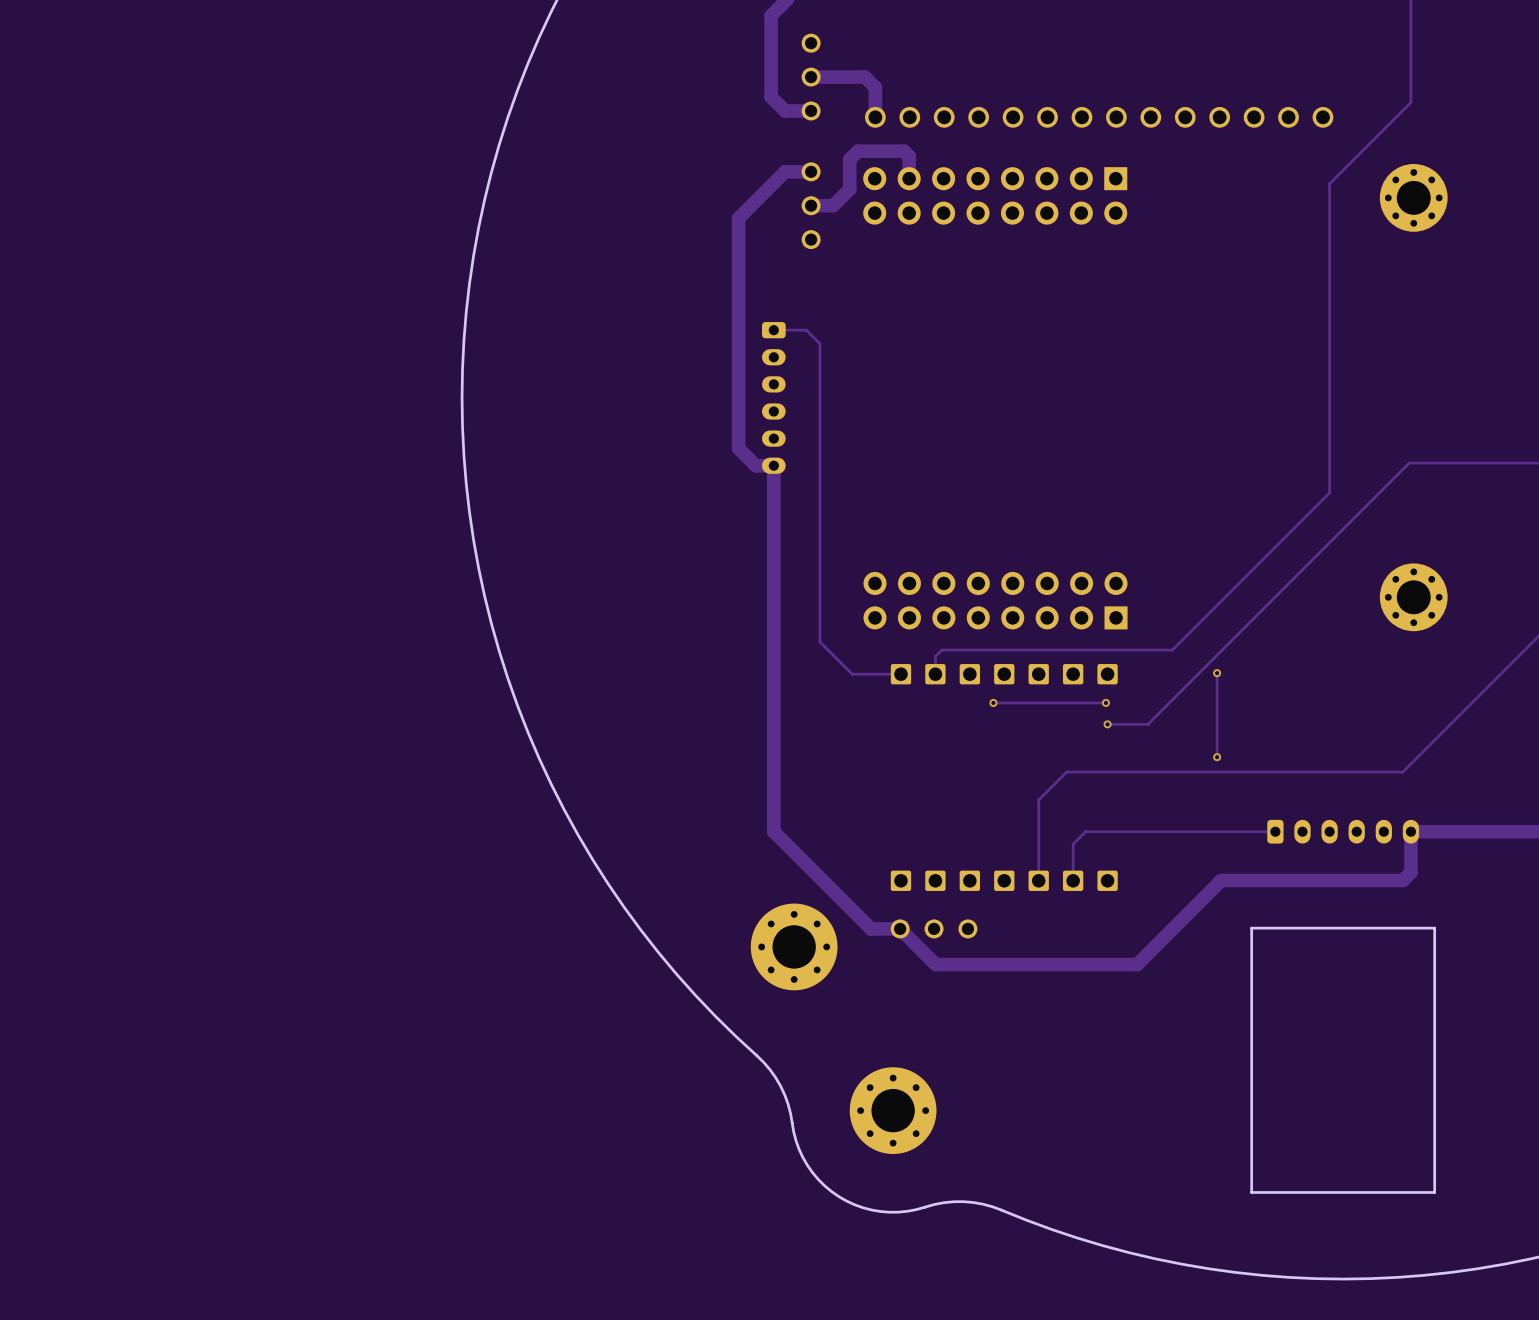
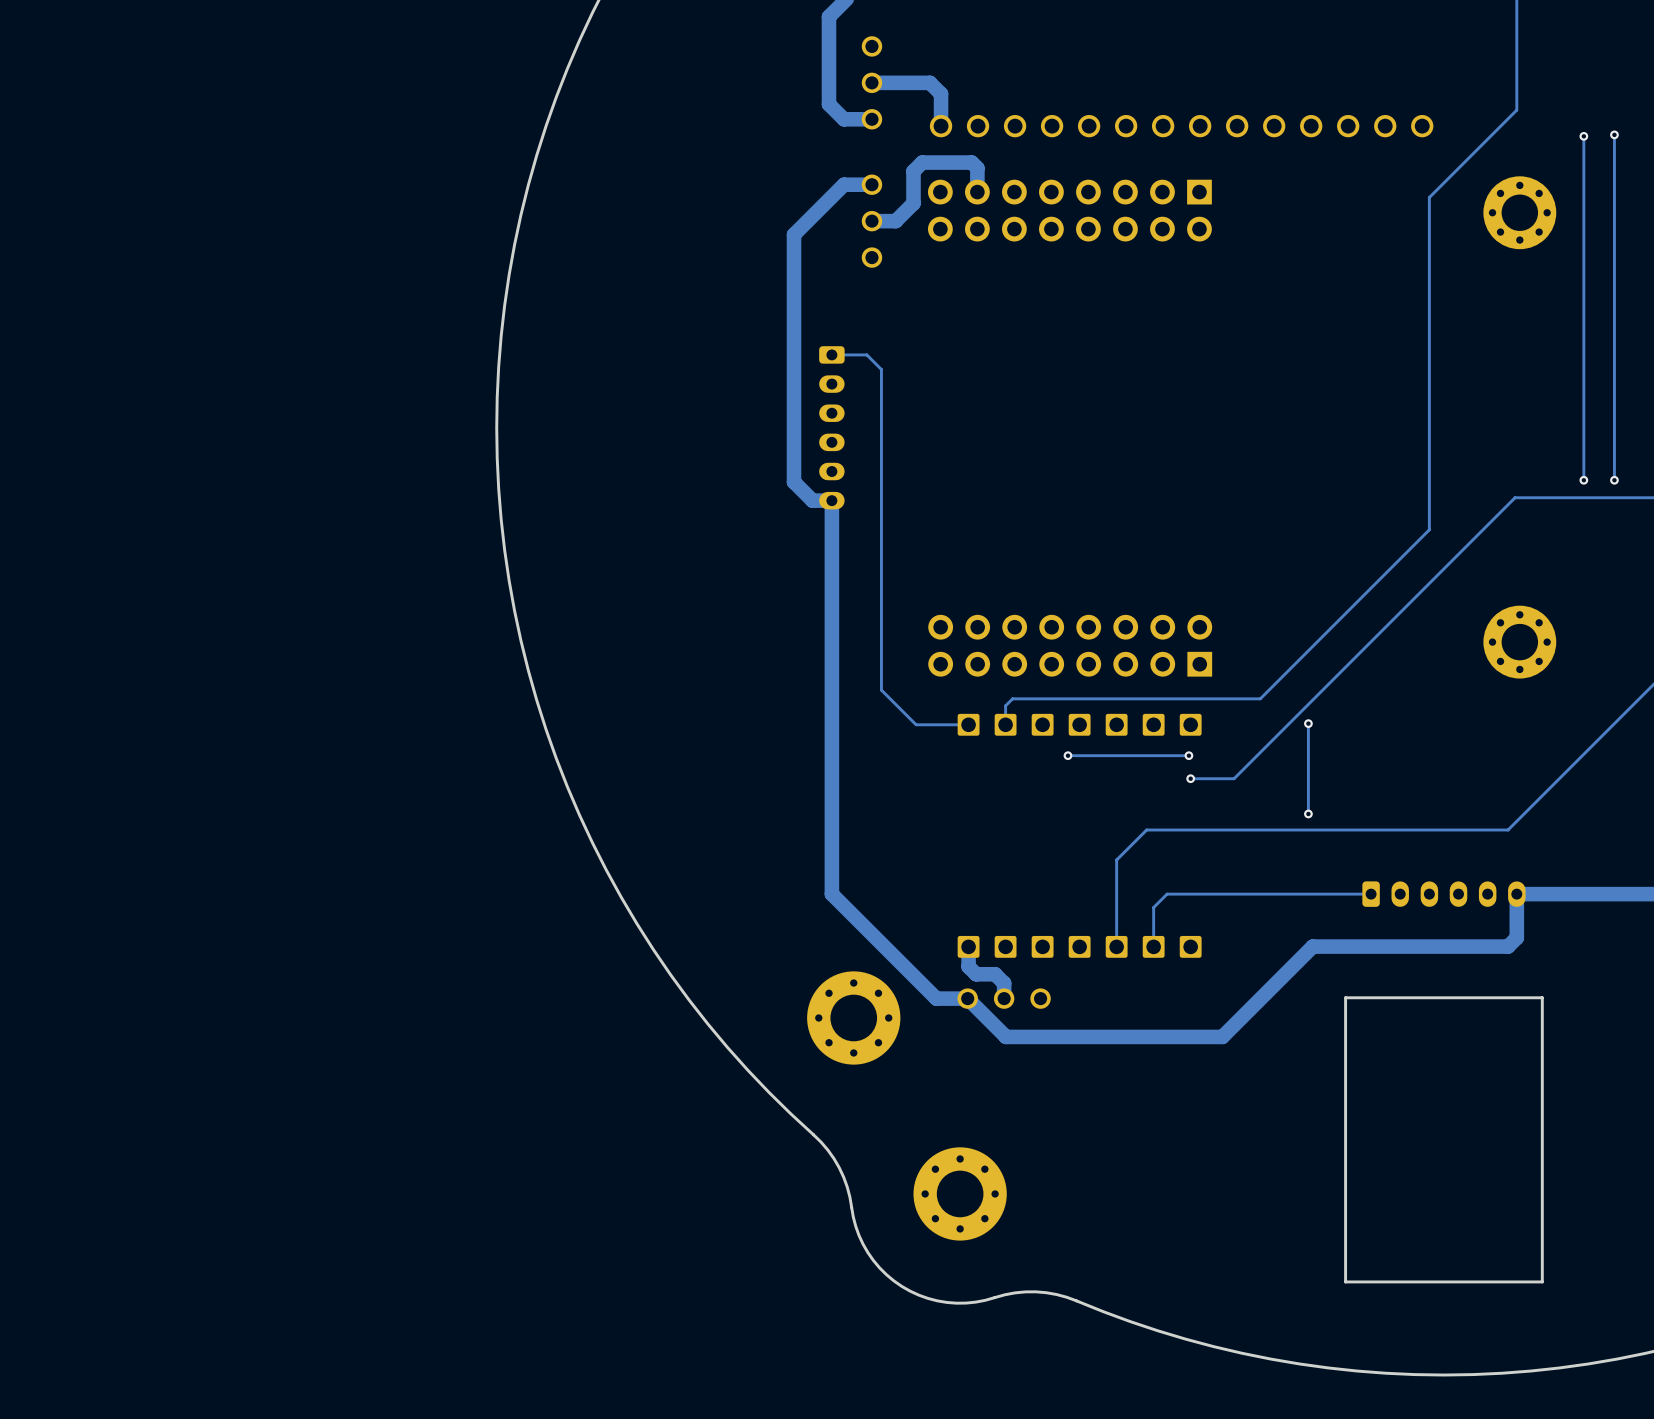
track: none -> (1614, 134) (1614, 480)
via: none -> (1614, 134)
track: none -> (1583, 136) (1583, 480)
via: none -> (1583, 136)
via: none -> (1583, 480)
via: none -> (1614, 480)
track: none -> (968, 946) (968, 966) (976, 974) (995, 974) (1004, 983) (1004, 998)

